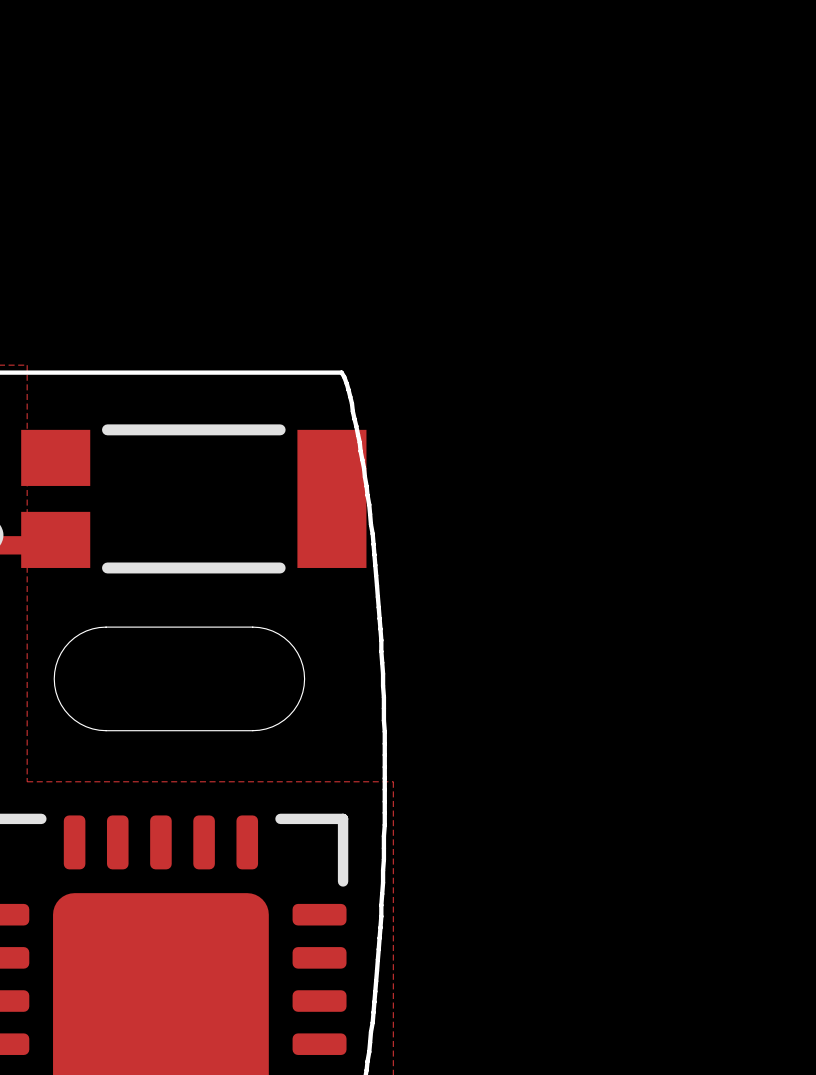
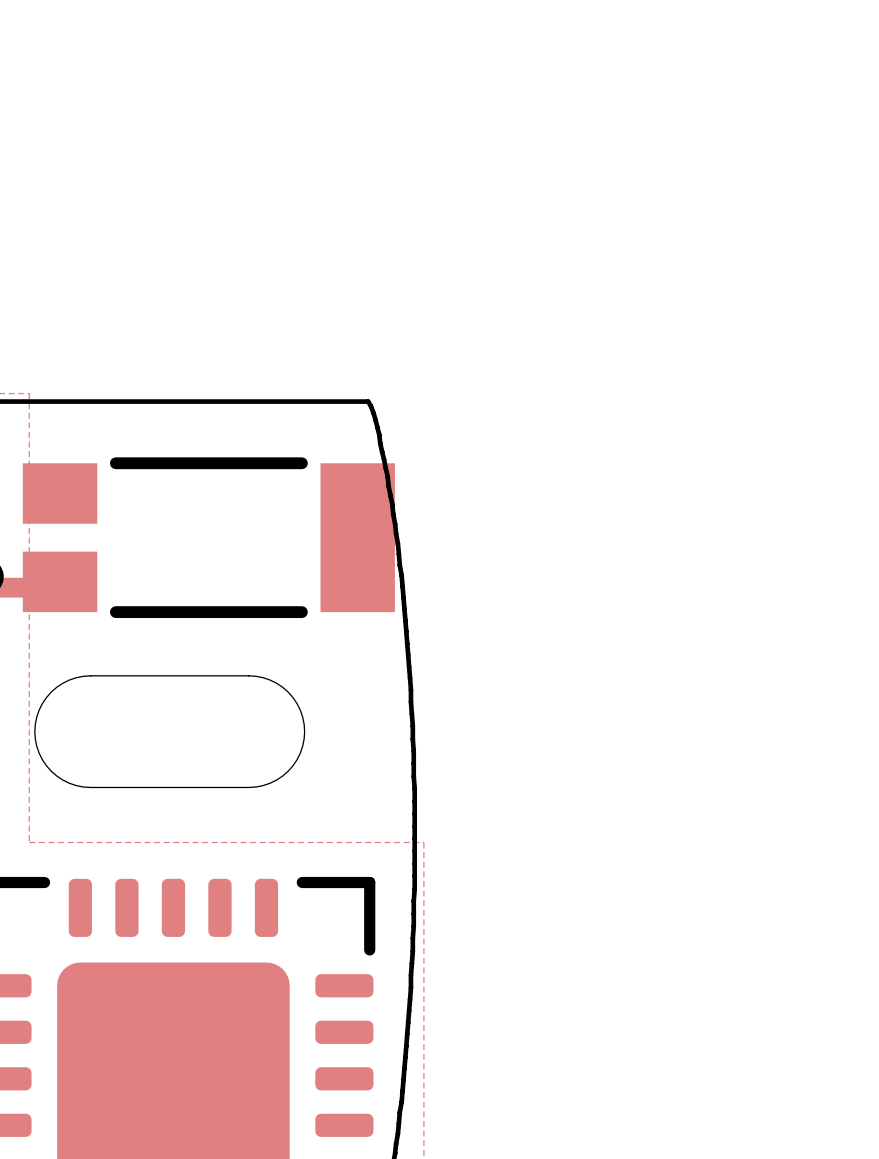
board edge: (106, 627) (86, 631) (69, 642) (58, 659) (54, 678) (58, 698) (69, 715) (86, 726) (106, 730) -> (114, 675) (76, 677) (56, 687) (46, 697) (39, 710) (34, 731) (39, 753) (46, 765) (56, 775) (76, 785) (114, 787)
board edge: (230, 627) (266, 628) (284, 637) (293, 647) (300, 659) (304, 678) (302, 692) (297, 704) (284, 719) (266, 728) (230, 730) -> (248, 675) (270, 680) (288, 692) (300, 710) (304, 731) (300, 753) (288, 771) (270, 783) (248, 787)

